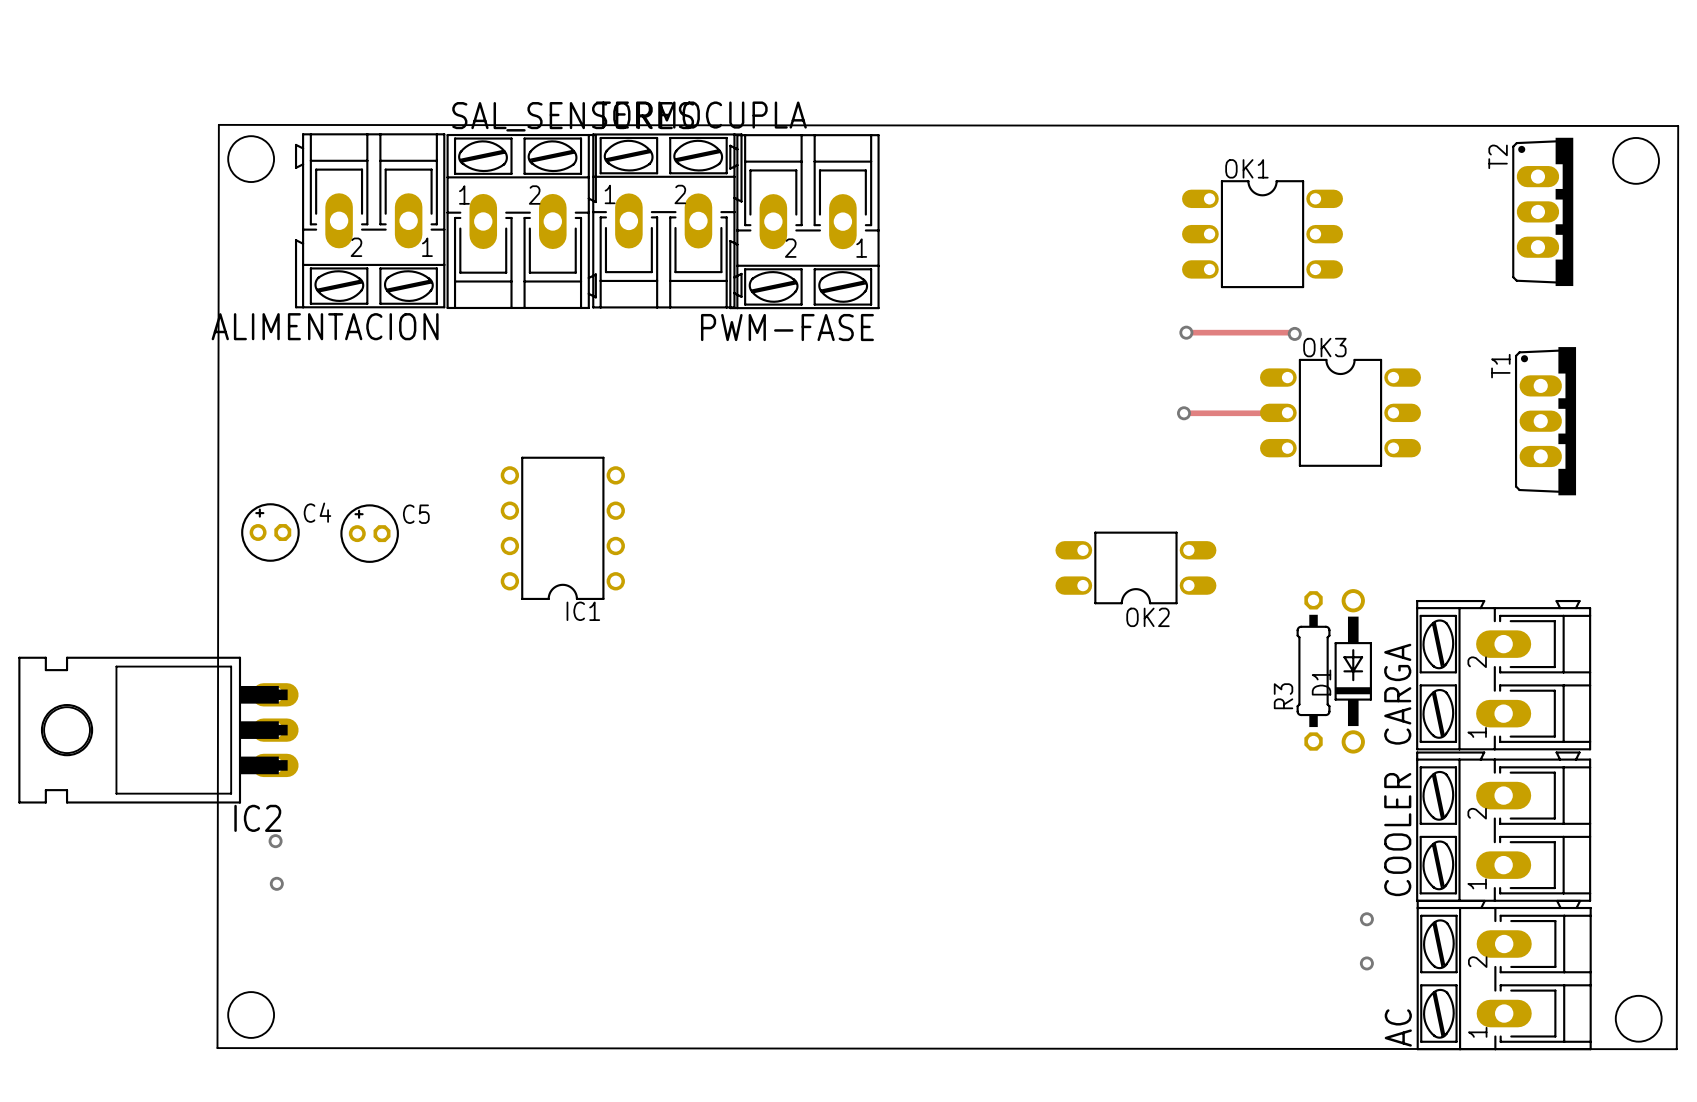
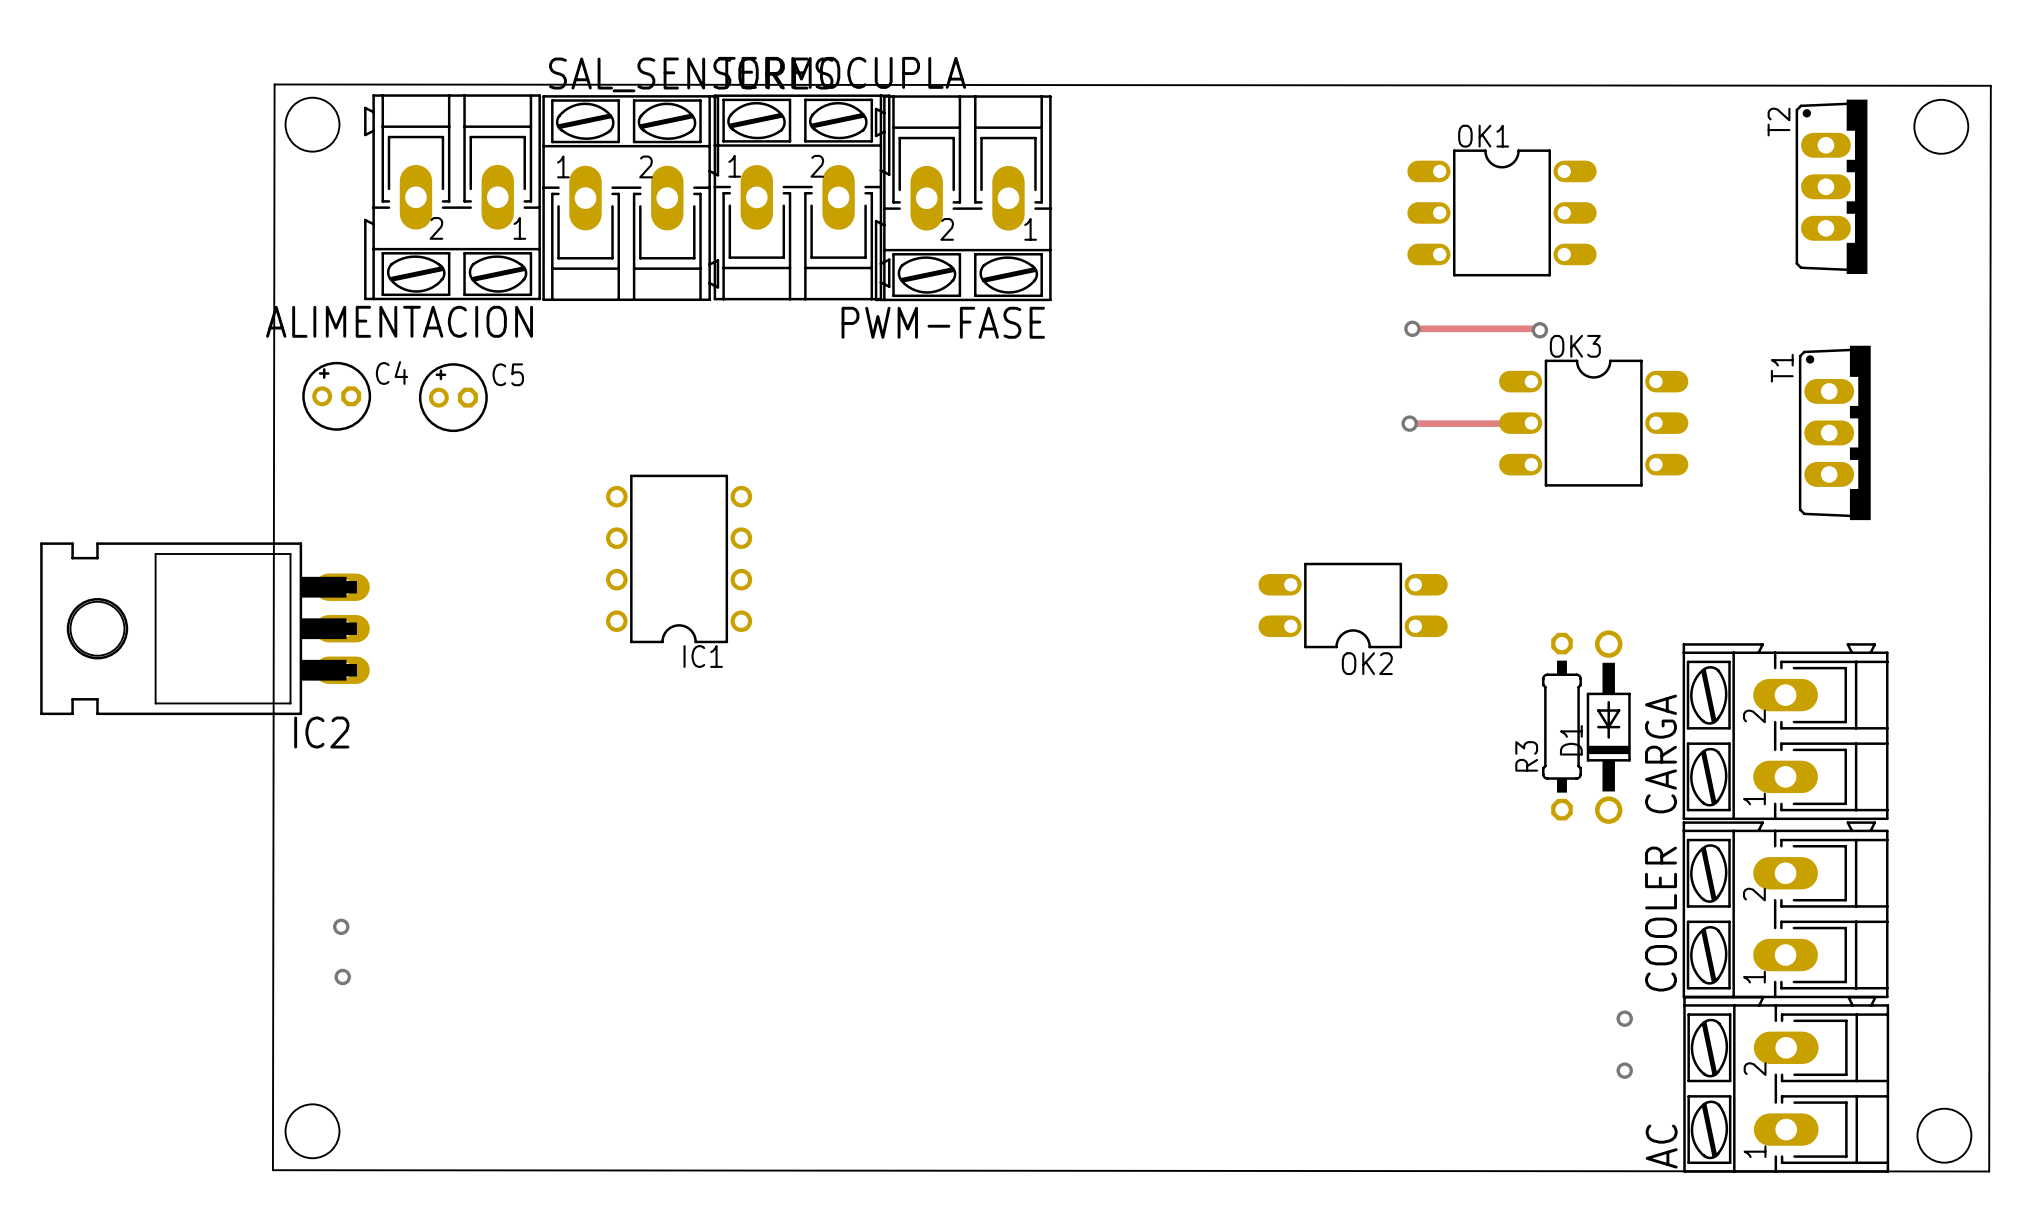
C4 position: (270, 532) -> (336, 396)
C5 position: (369, 533) -> (453, 397)
IC2 position: (158, 730) -> (204, 628)

